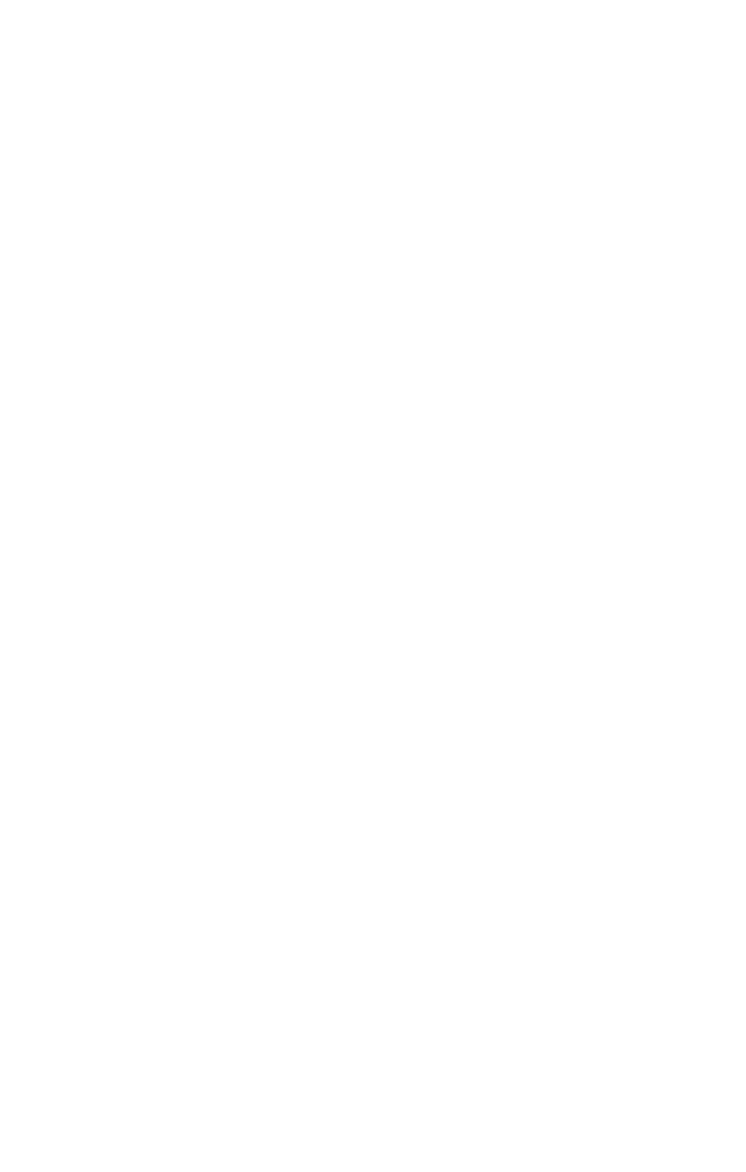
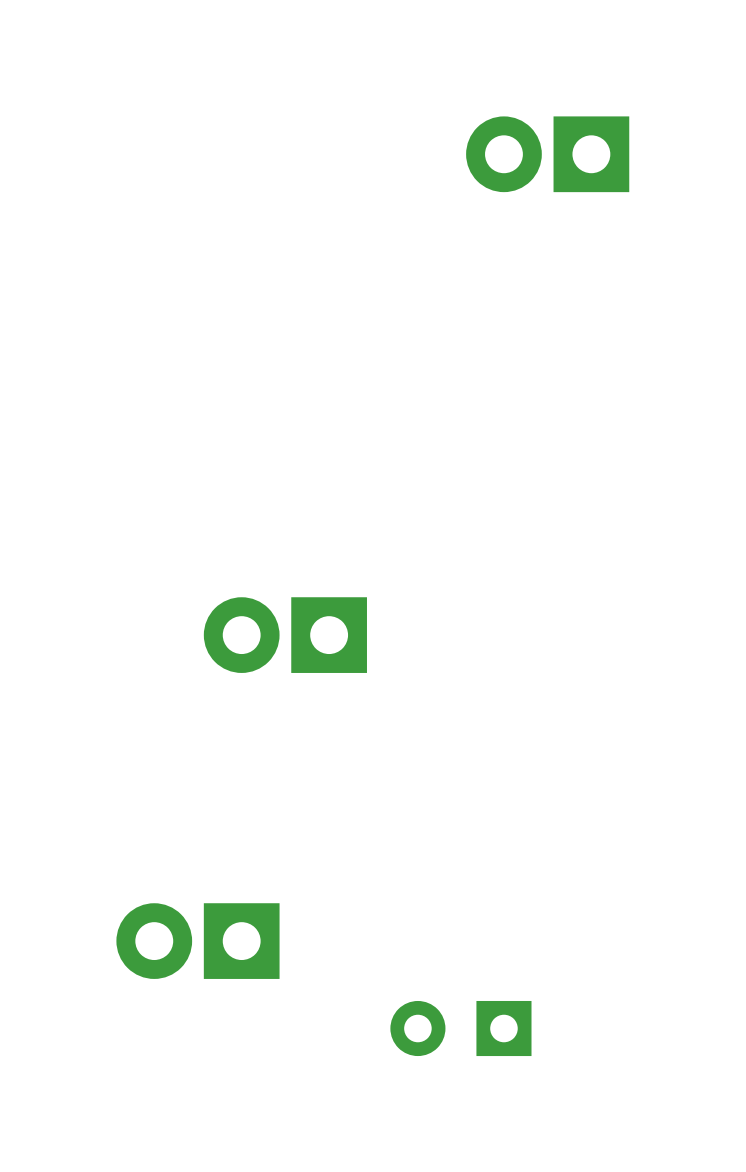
part: none -> (547, 154)
part: none -> (285, 635)
part: none -> (197, 941)
part: none -> (460, 1028)

